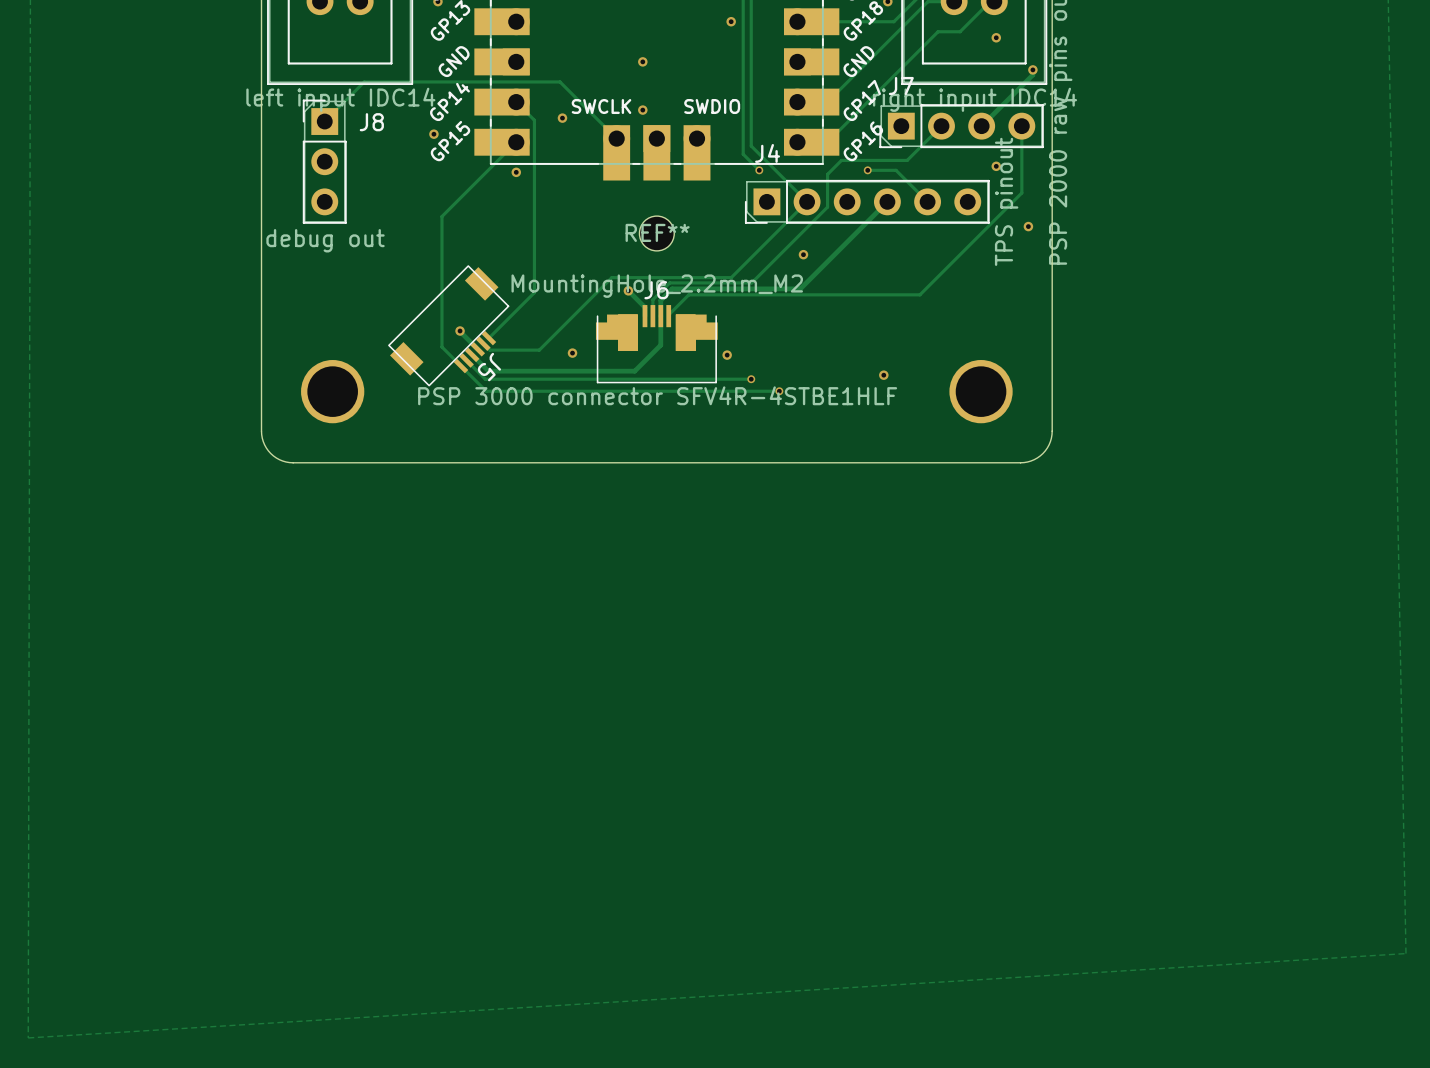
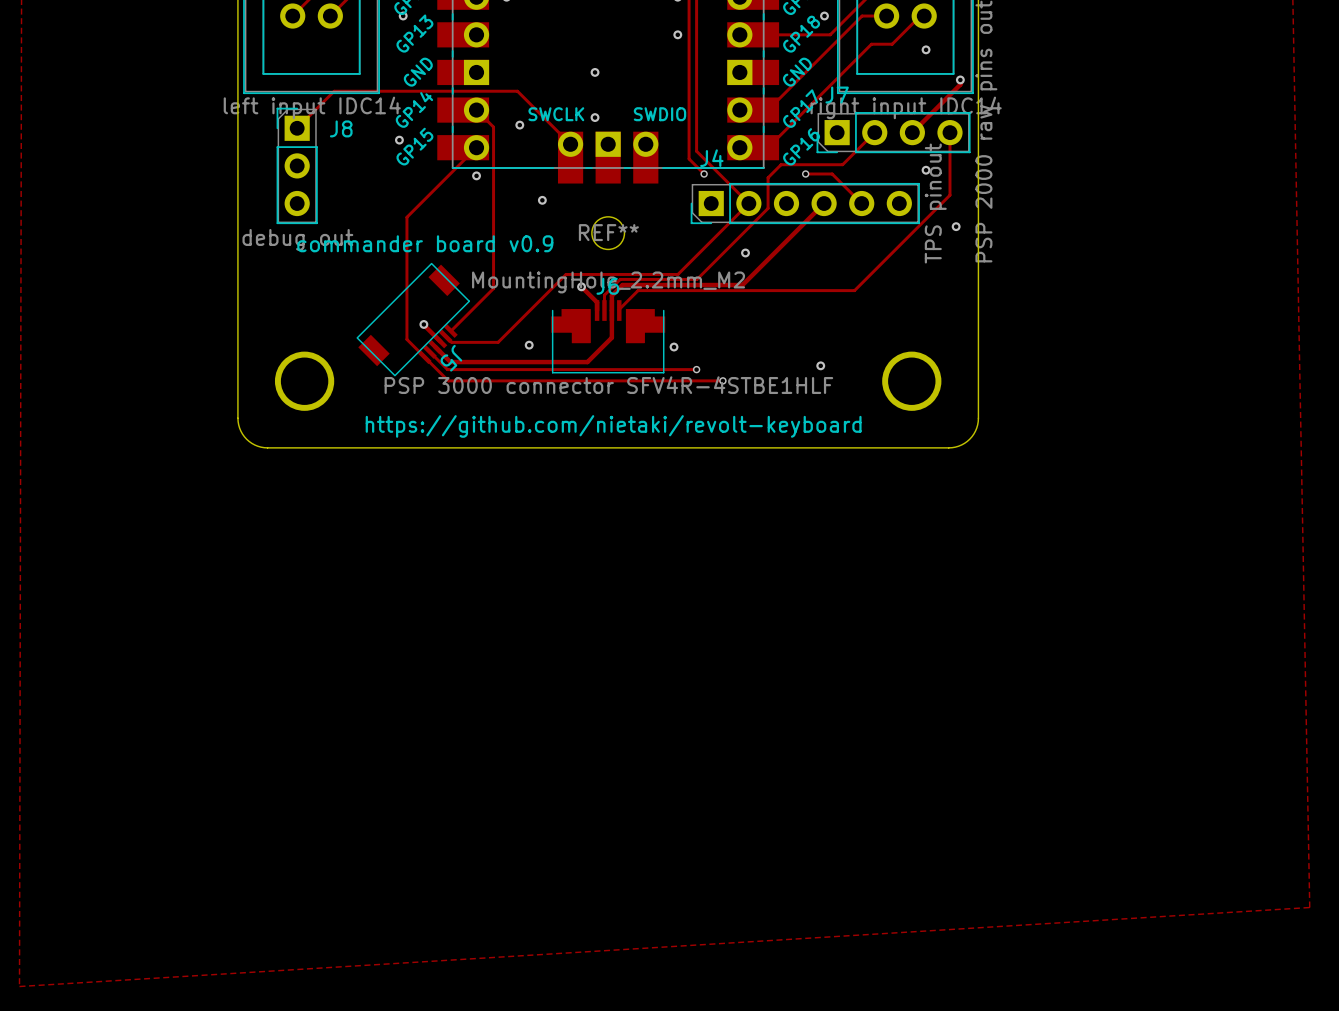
via: none -> (542, 200)
text: none -> commander board v0.9 (425, 243)
text: none -> https://github.com/nietaki/revolt-keyboard (613, 426)

